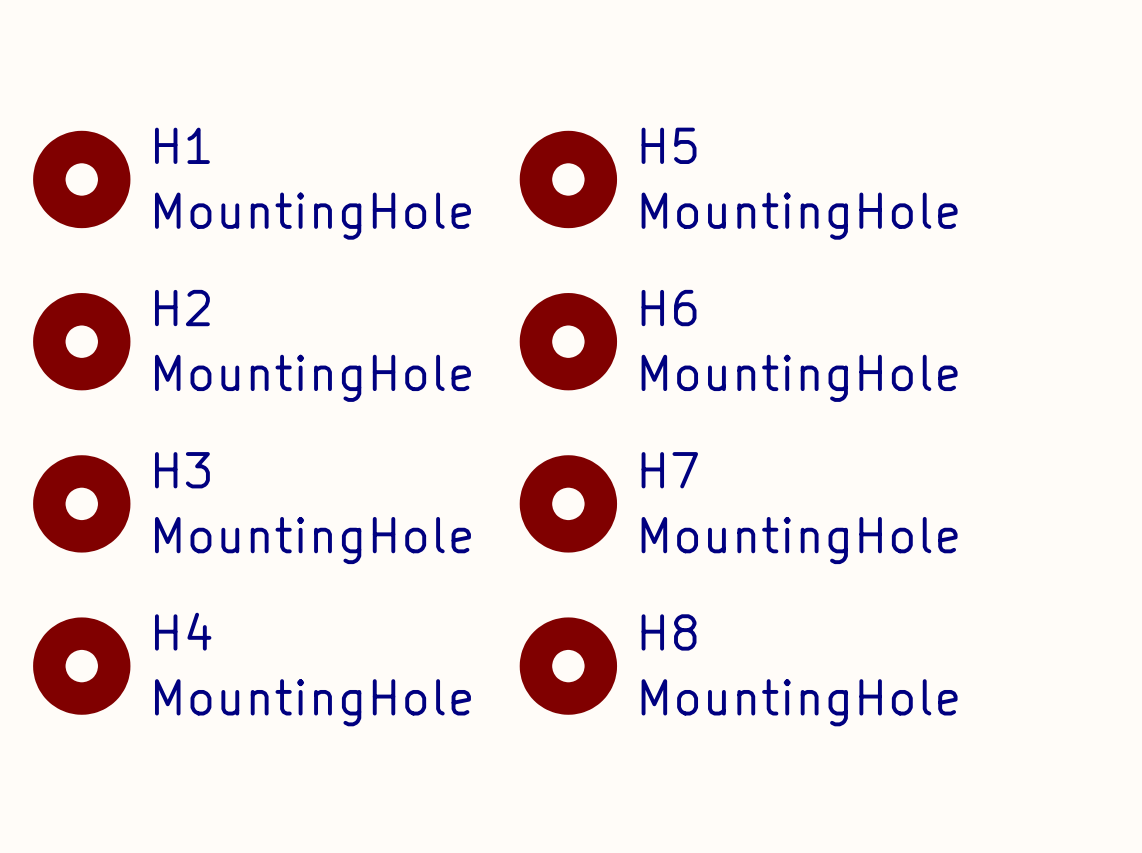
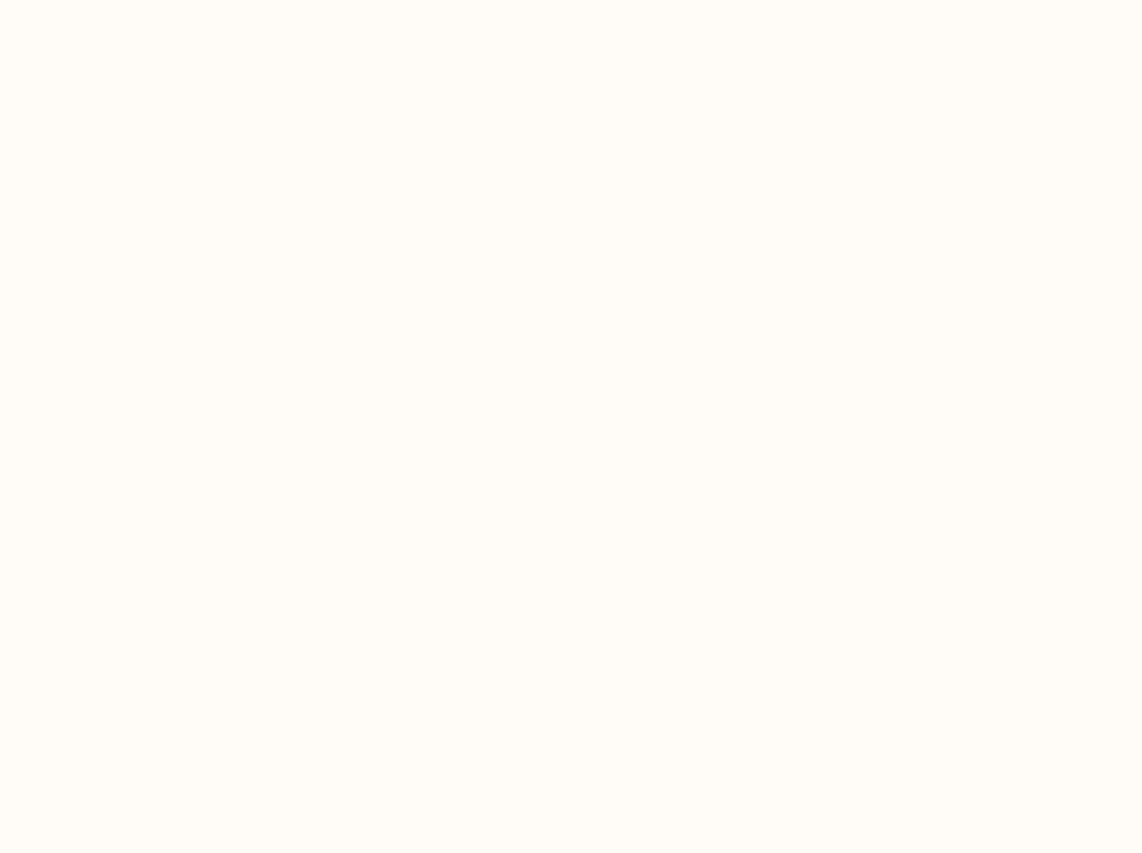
H1: MountingHole (81, 179) -> none
H5: MountingHole (568, 179) -> none
H2: MountingHole (81, 341) -> none
H6: MountingHole (568, 341) -> none
H3: MountingHole (81, 503) -> none
H7: MountingHole (568, 503) -> none
H4: MountingHole (81, 666) -> none
H8: MountingHole (568, 666) -> none

